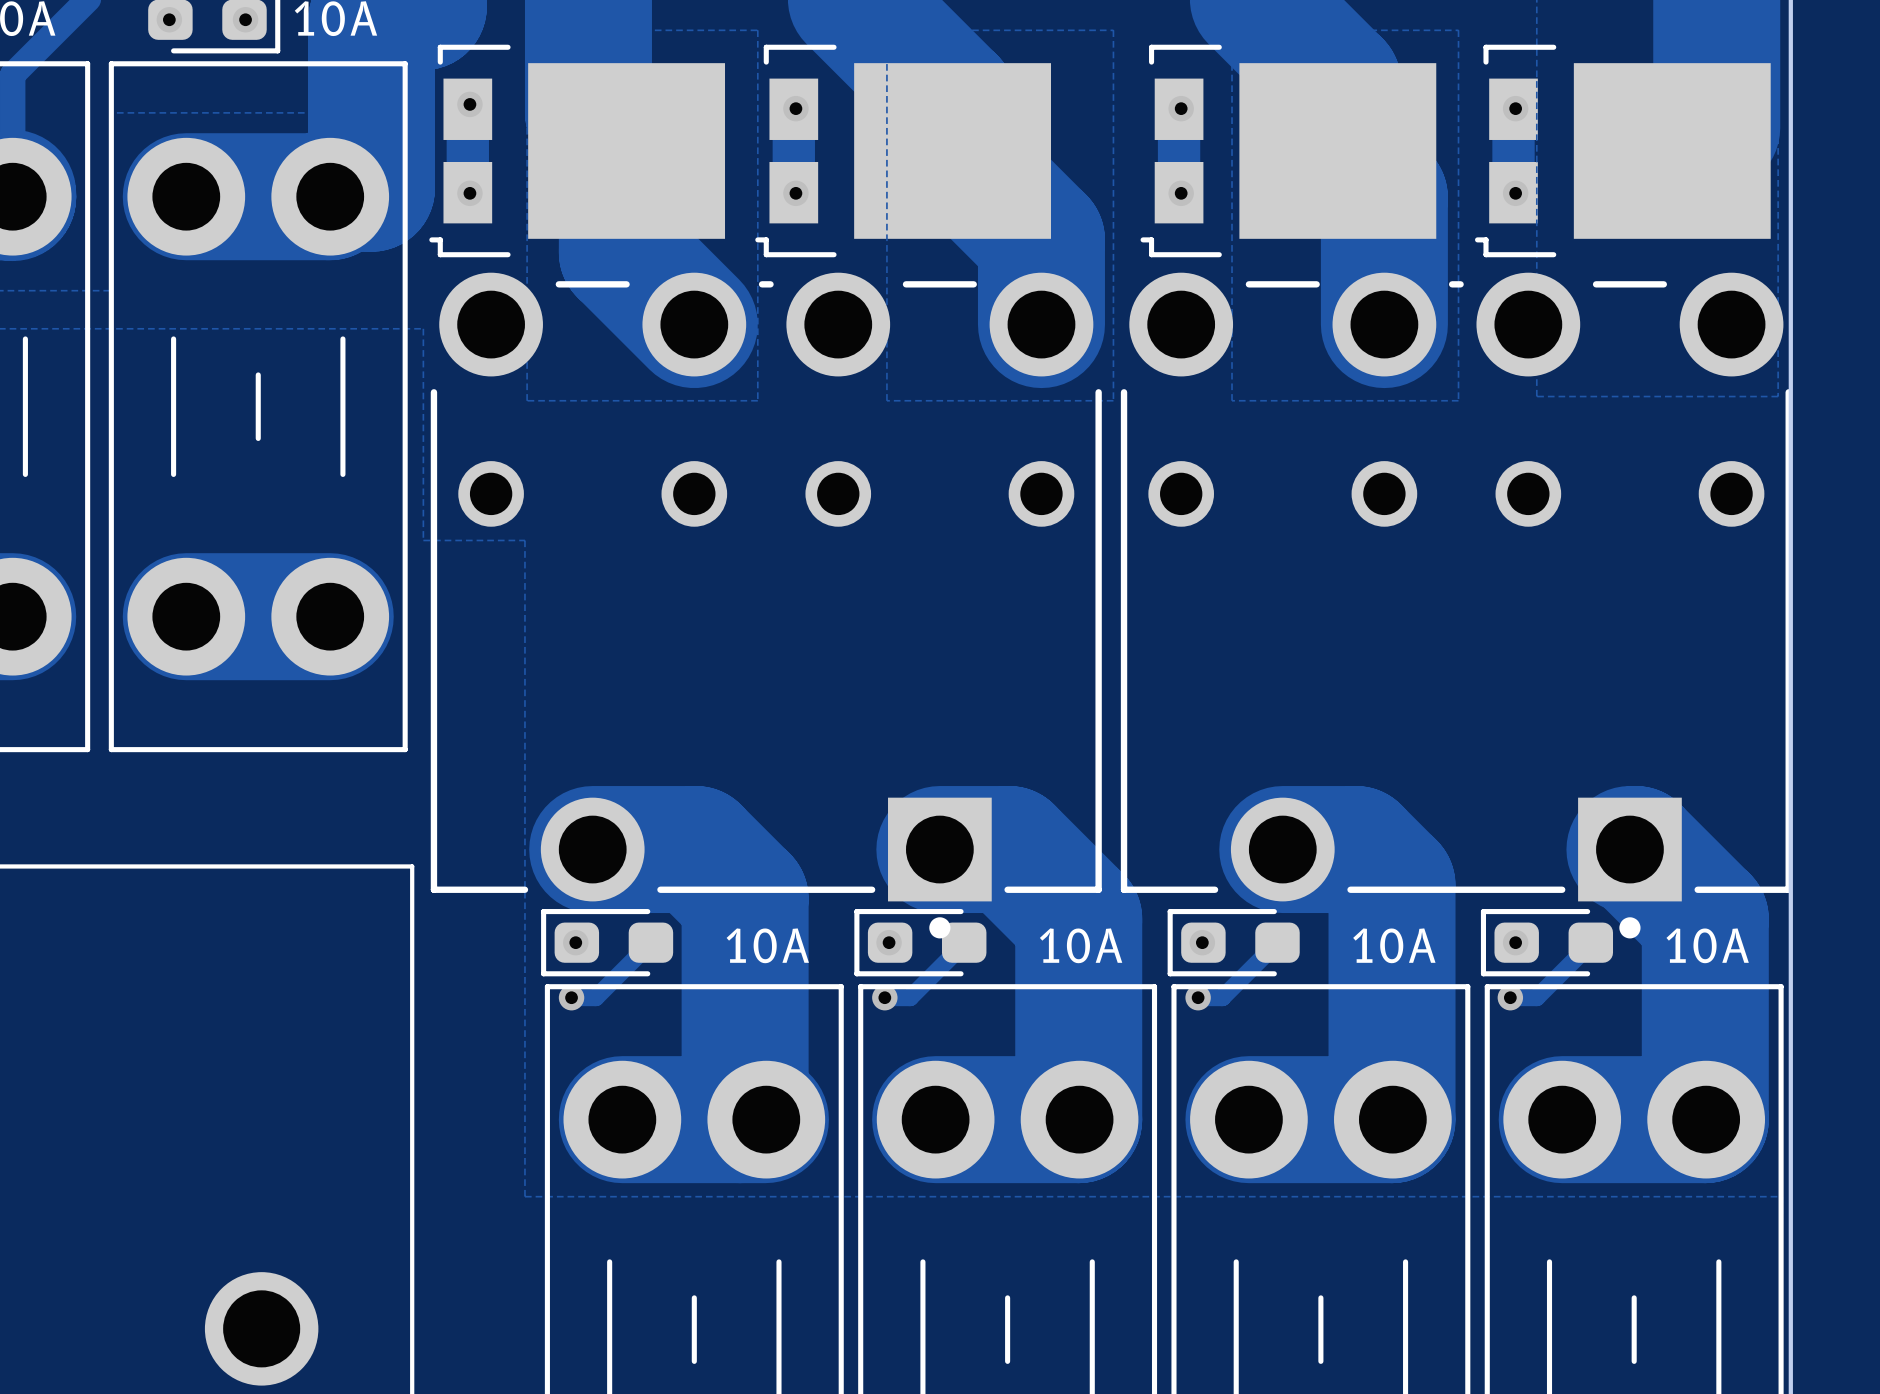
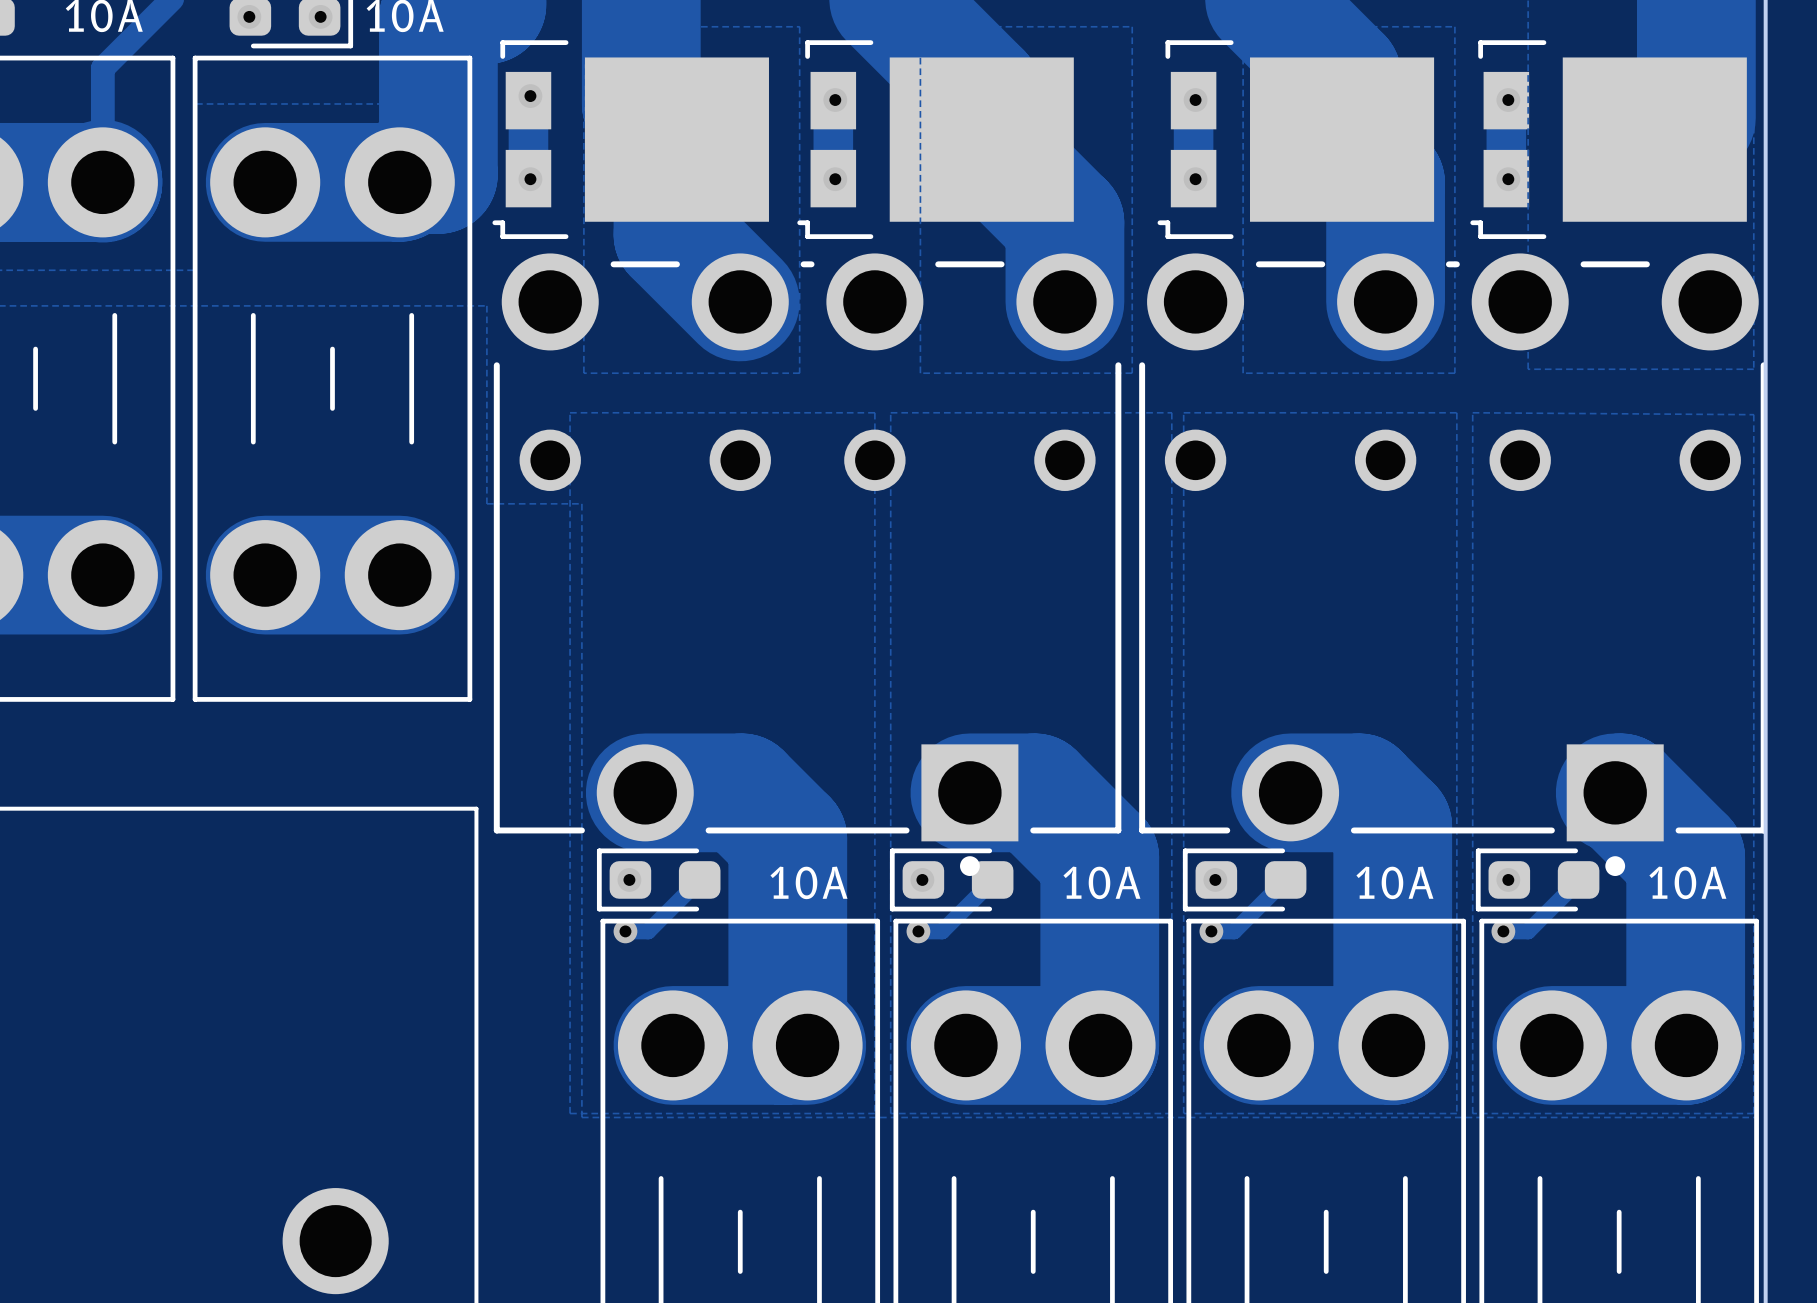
zone outline: none -> (570, 412) (874, 412) (874, 1113) (570, 1113) (570, 412)
zone outline: none -> (890, 412) (1171, 412) (1171, 1113) (890, 1113) (890, 412)
zone outline: none -> (1183, 412) (1183, 1113) (1456, 1113) (1456, 412) (1183, 412)
zone outline: none -> (1472, 412) (1472, 1113) (1753, 1113) (1753, 414) (1472, 412)

